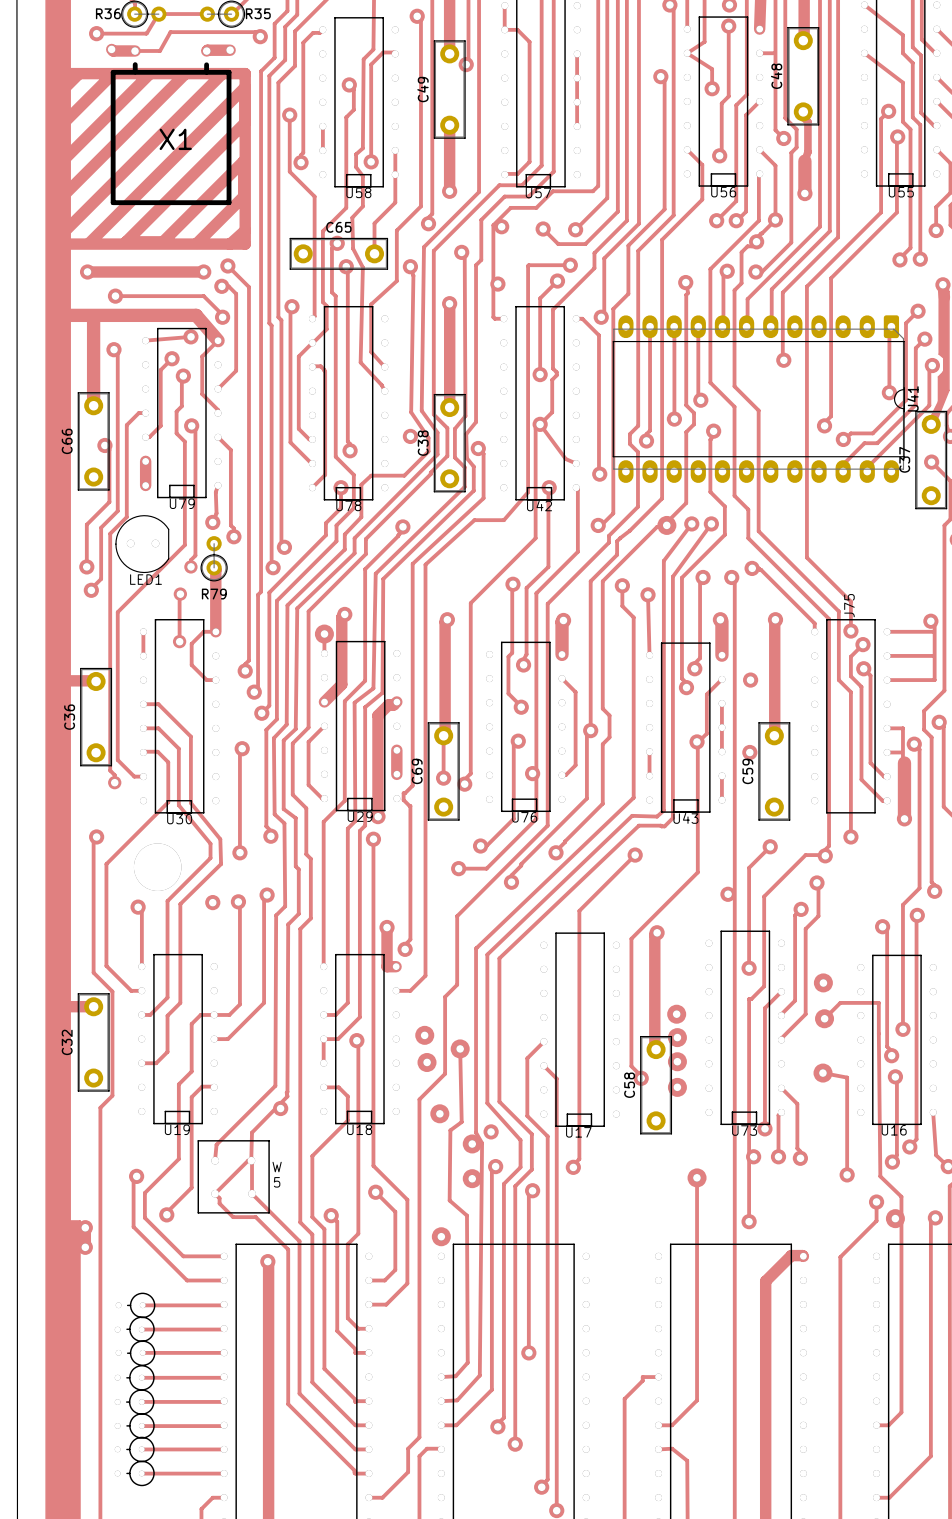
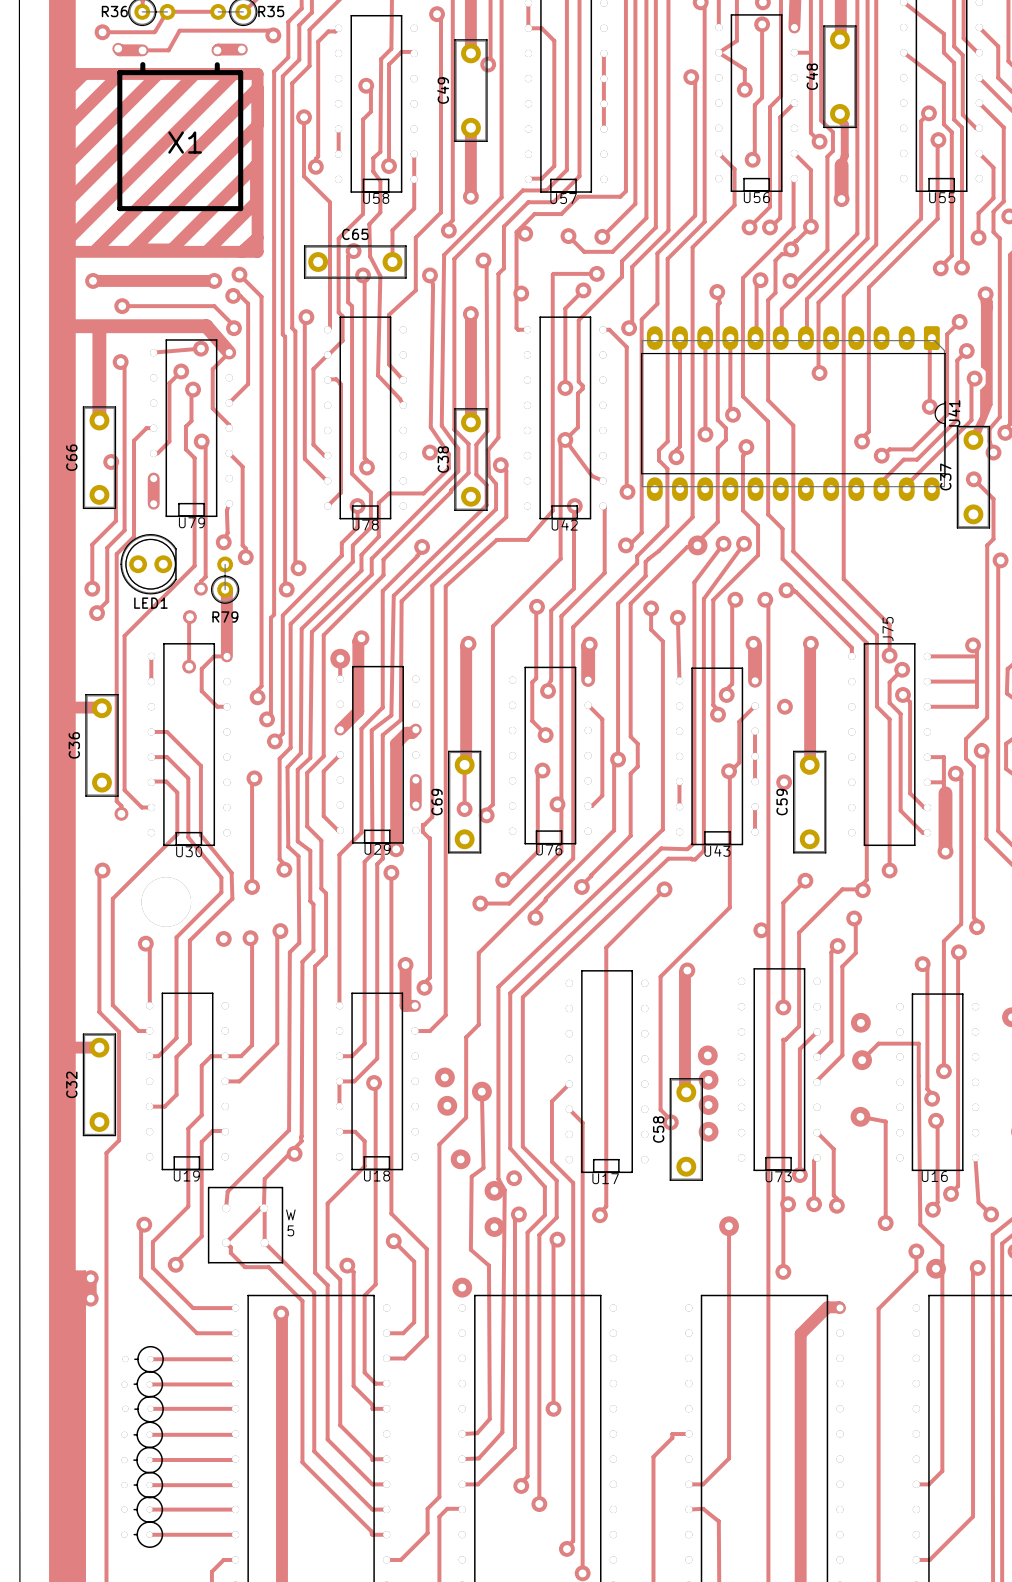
drawing: [115, 515, 170, 574] -> none
LED1: none -> (148, 564)
text: LED1 (146, 579) -> none

